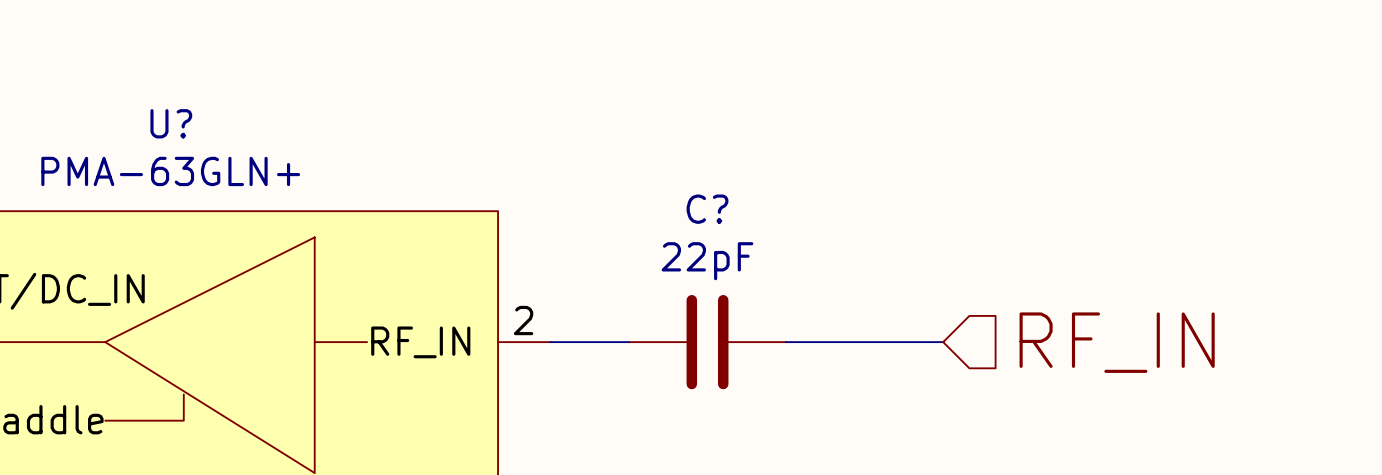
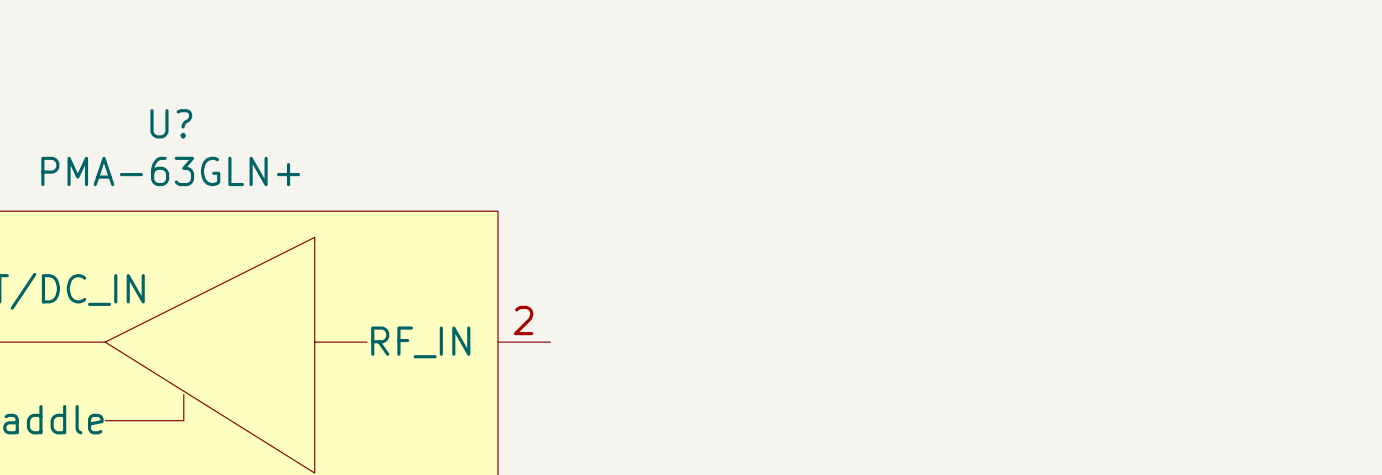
wire: (550, 342) (628, 342) -> none
C?: 22pF (707, 342) -> none
wire: (786, 342) (943, 342) -> none
hierarchical label: RF_IN (1117, 342) -> none

